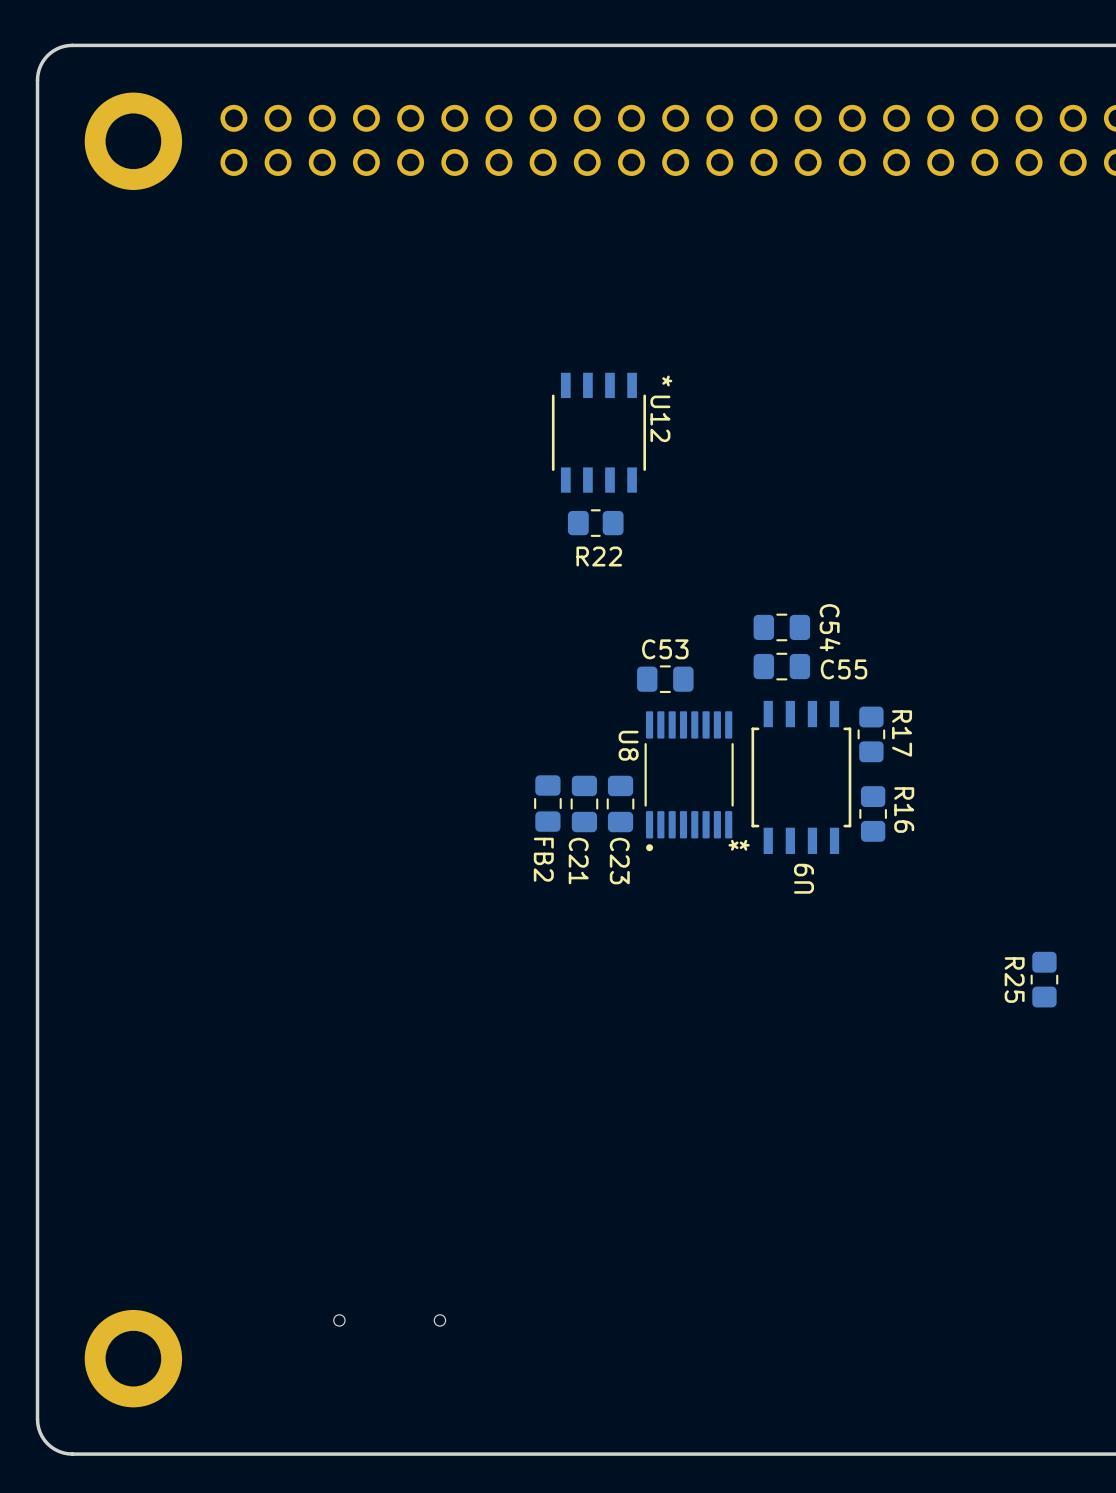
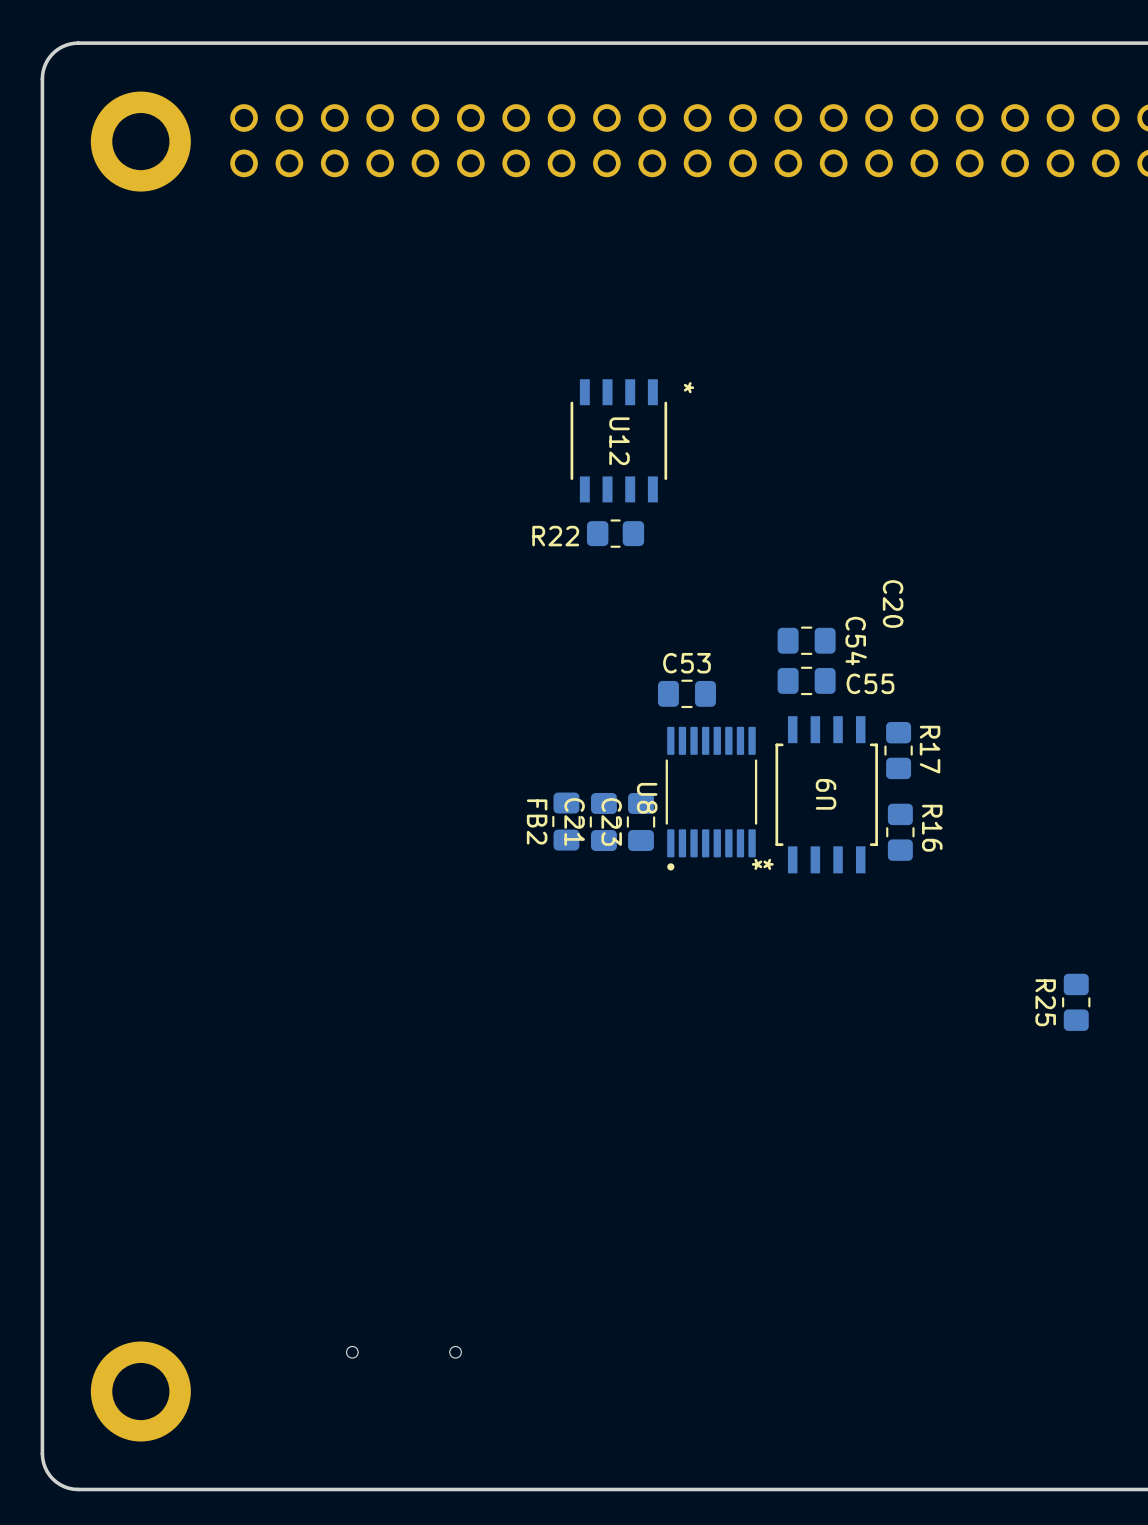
U12 name position: U12 (660, 418) -> U12 (619, 441)
R22 name position: R22 (599, 556) -> R22 (555, 536)
C20: none -> (893, 604)
U8 name position: U8 (628, 745) -> U8 (647, 798)
FB2 name position: FB2 (543, 859) -> FB2 (537, 821)
C21 name position: C21 (578, 861) -> C21 (574, 821)
C23 name position: C23 (619, 861) -> C23 (611, 821)
U9 name position: U9 (804, 878) -> U9 (826, 794)

